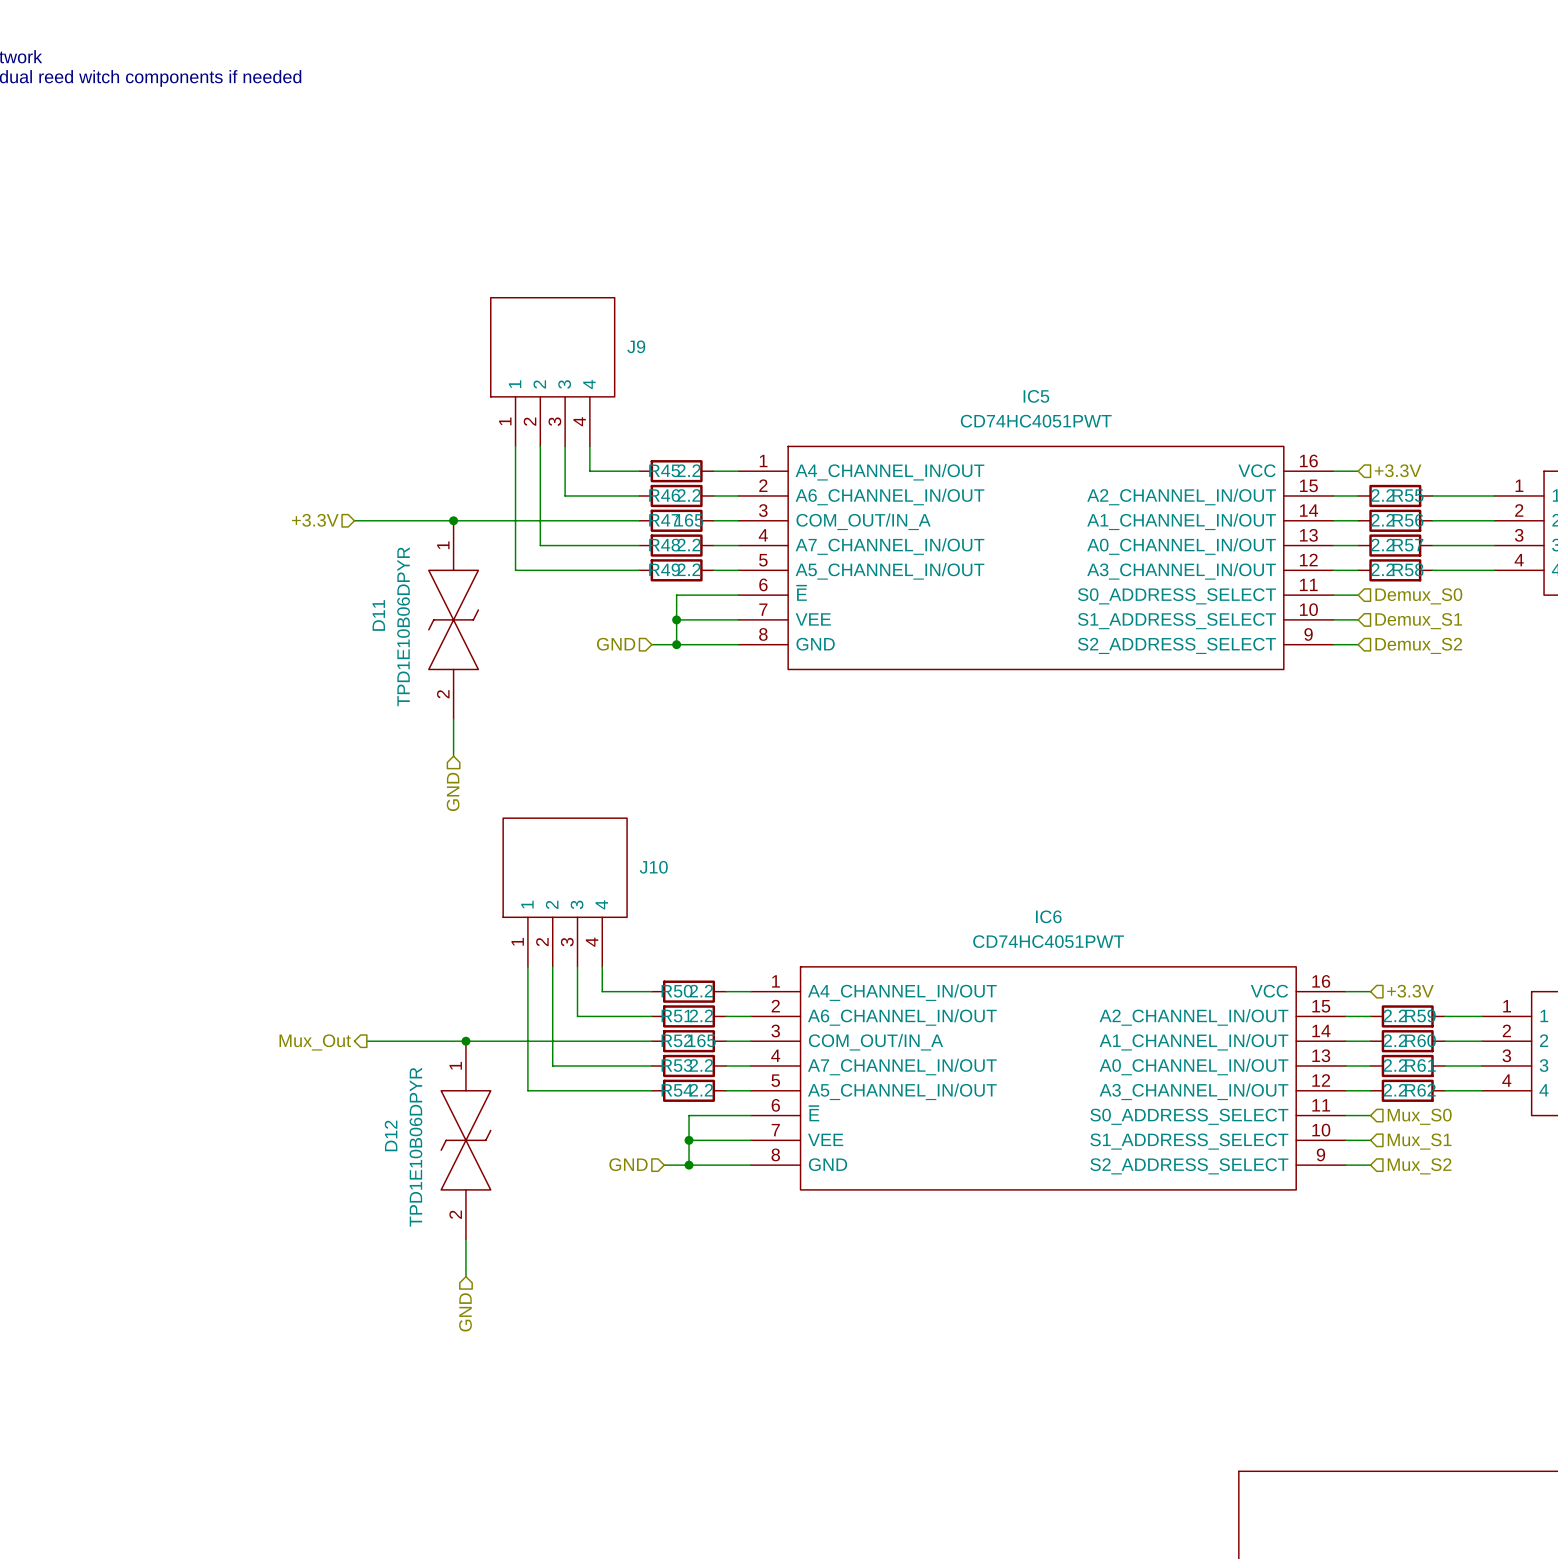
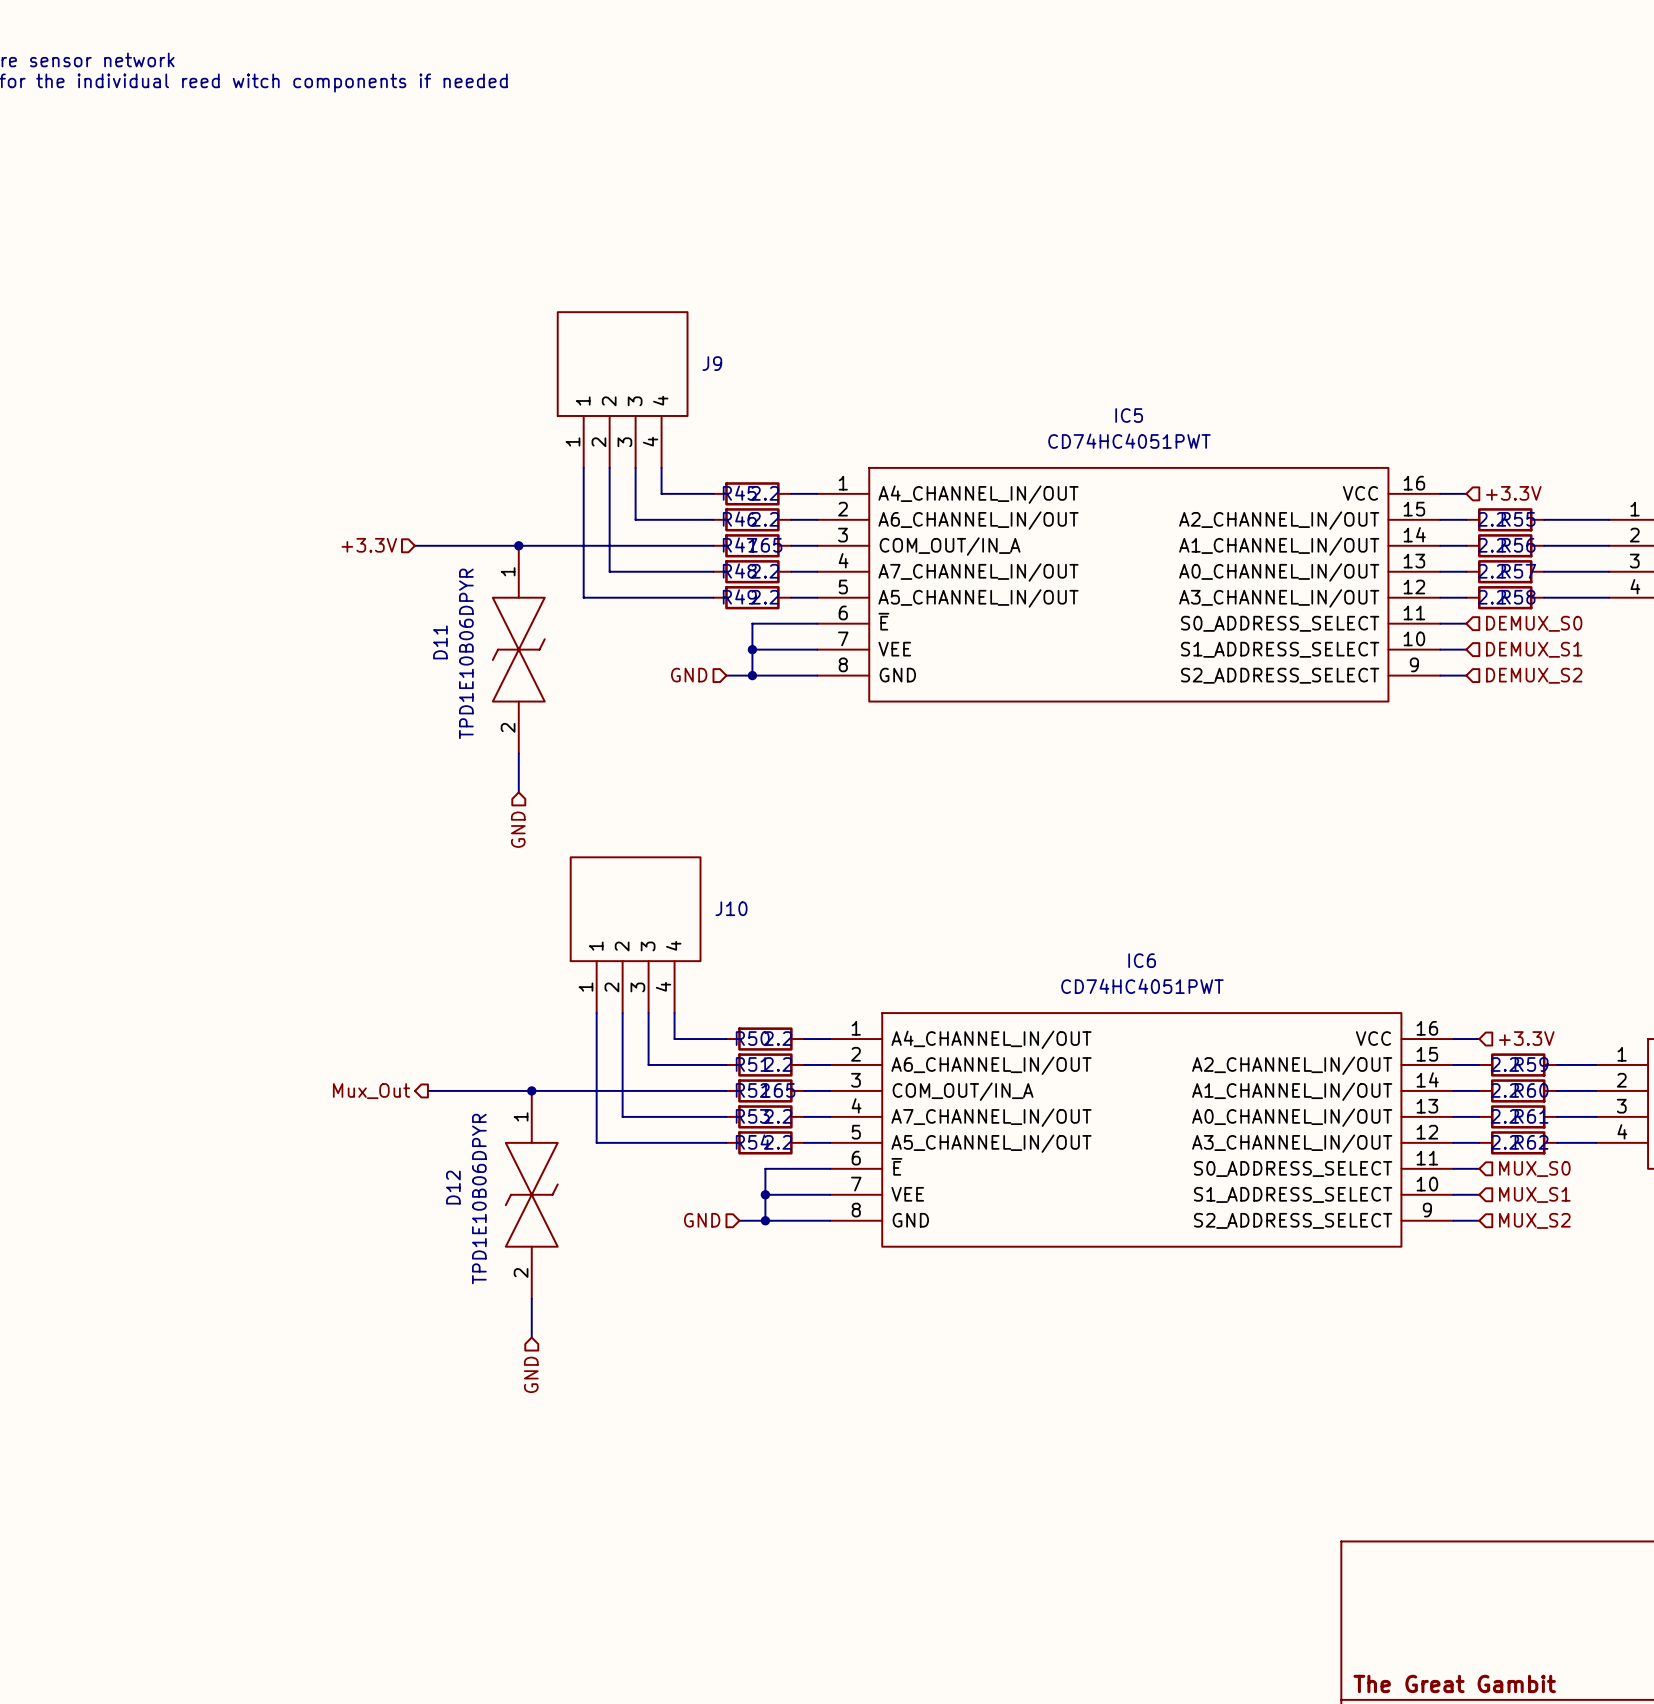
hierarchical label: Demux_S0 (1418, 596) -> DEMUX_S0 (1534, 623)
hierarchical label: Demux_S1 (1418, 621) -> DEMUX_S1 (1534, 649)
hierarchical label: Demux_S2 (1418, 645) -> DEMUX_S2 (1534, 675)
hierarchical label: Mux_S0 (1419, 1116) -> MUX_S0 (1534, 1168)
hierarchical label: Mux_S1 (1419, 1141) -> MUX_S1 (1534, 1194)
hierarchical label: Mux_S2 (1419, 1166) -> MUX_S2 (1534, 1220)

